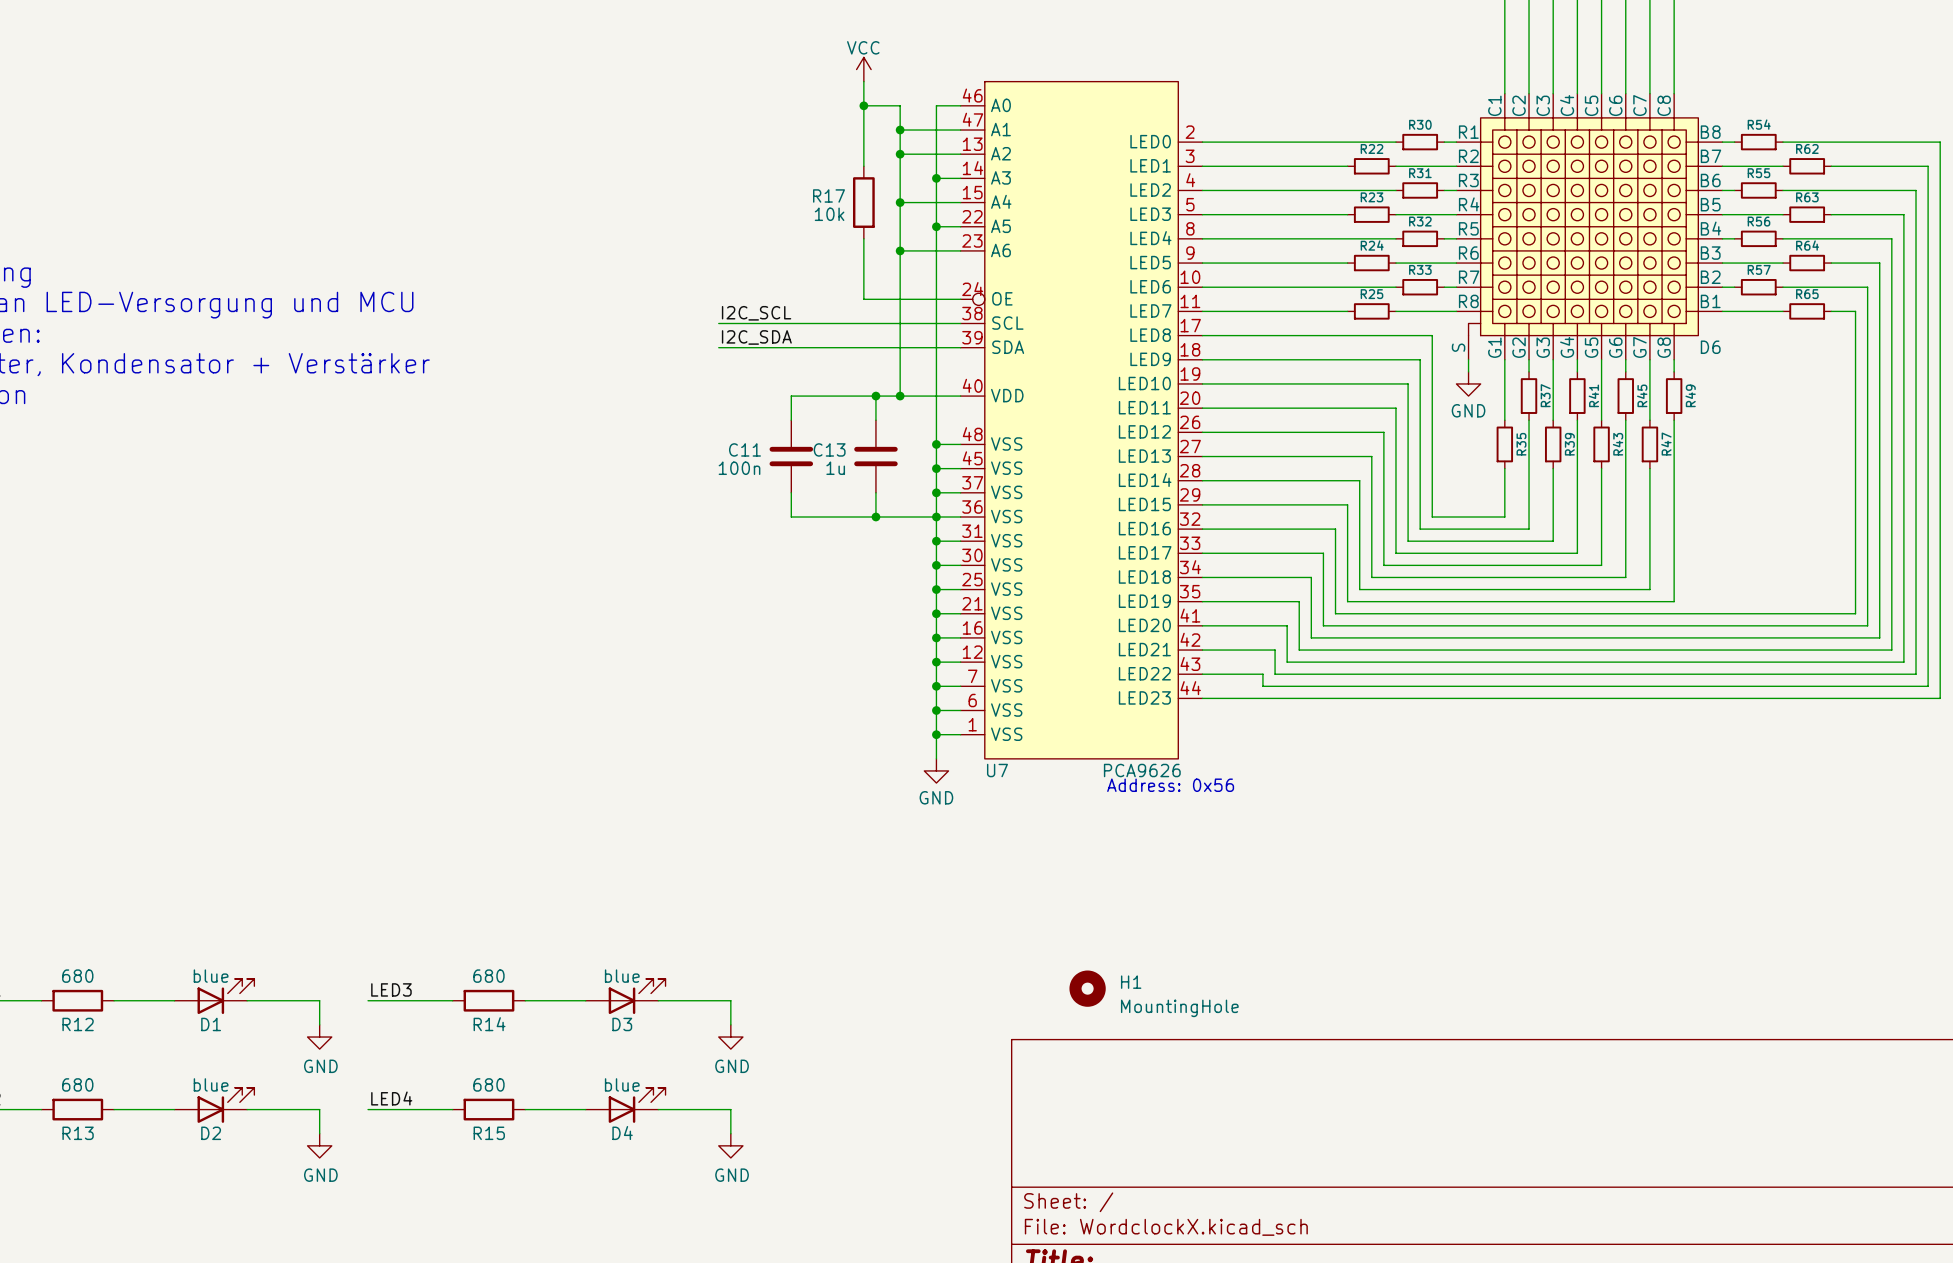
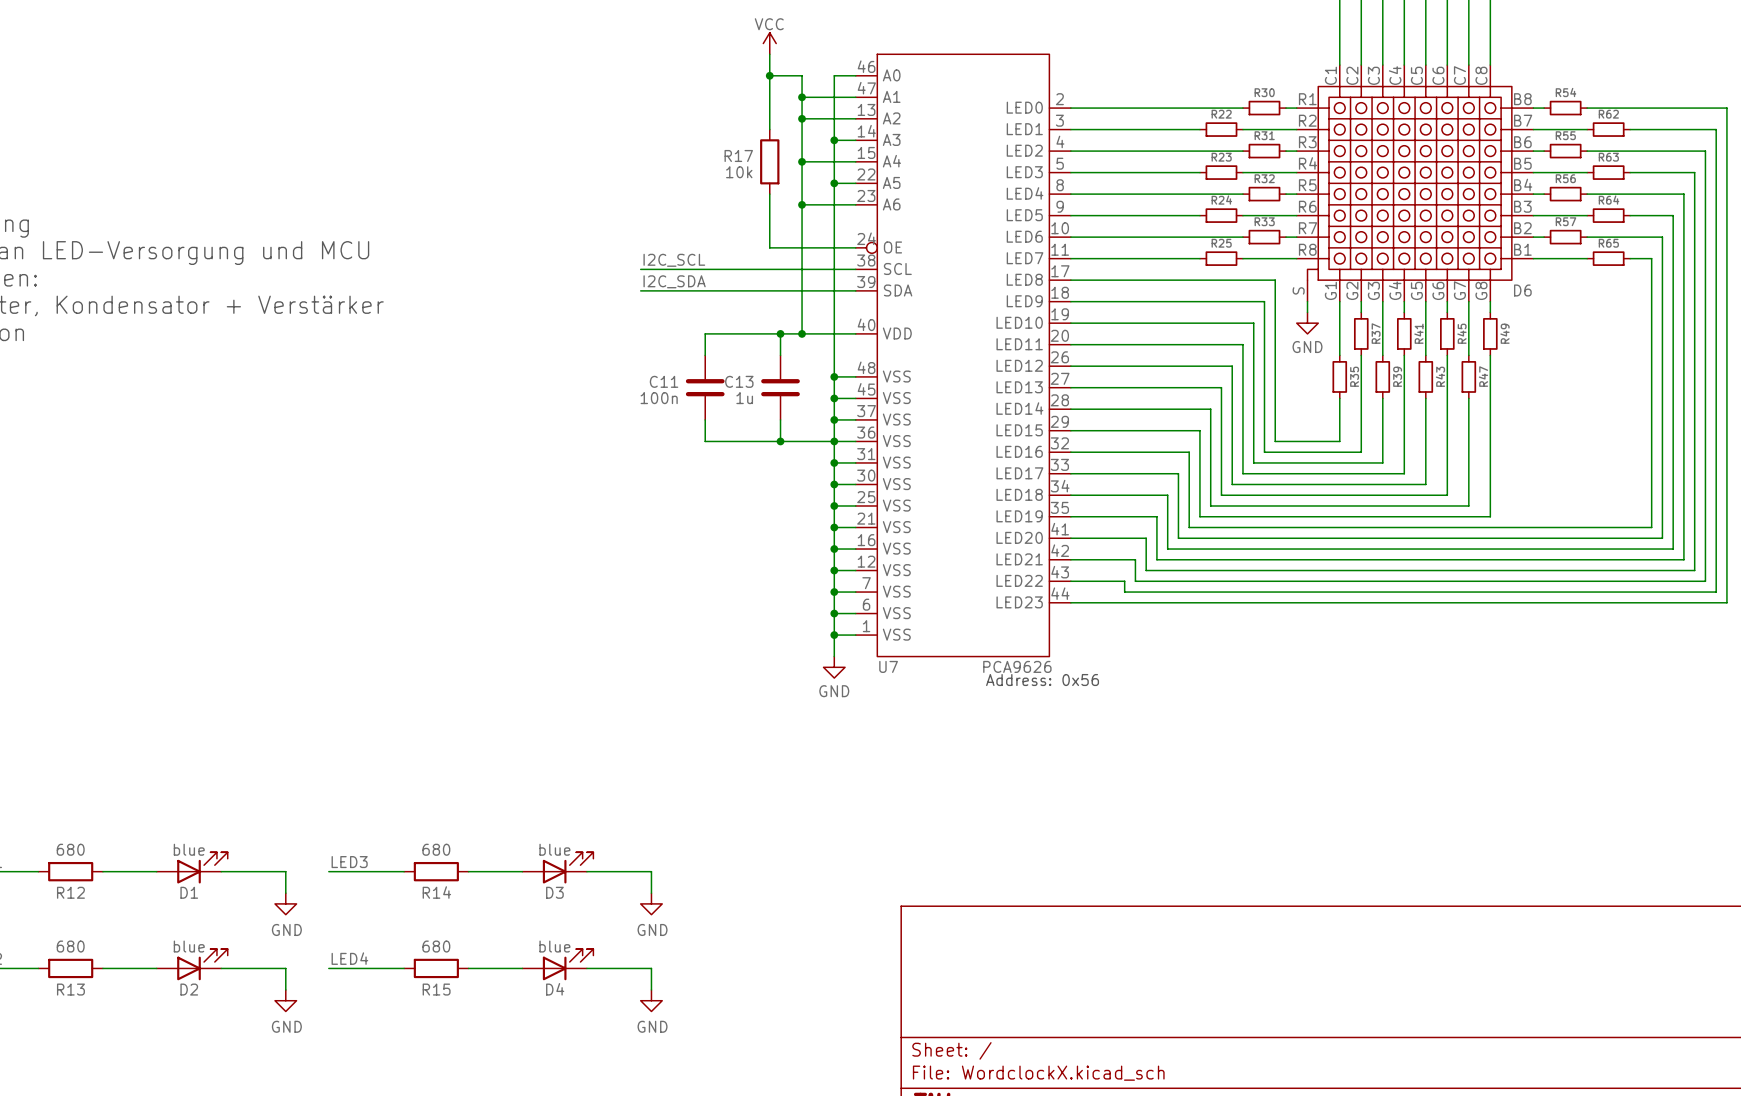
H1: MountingHole (1087, 988) -> none

